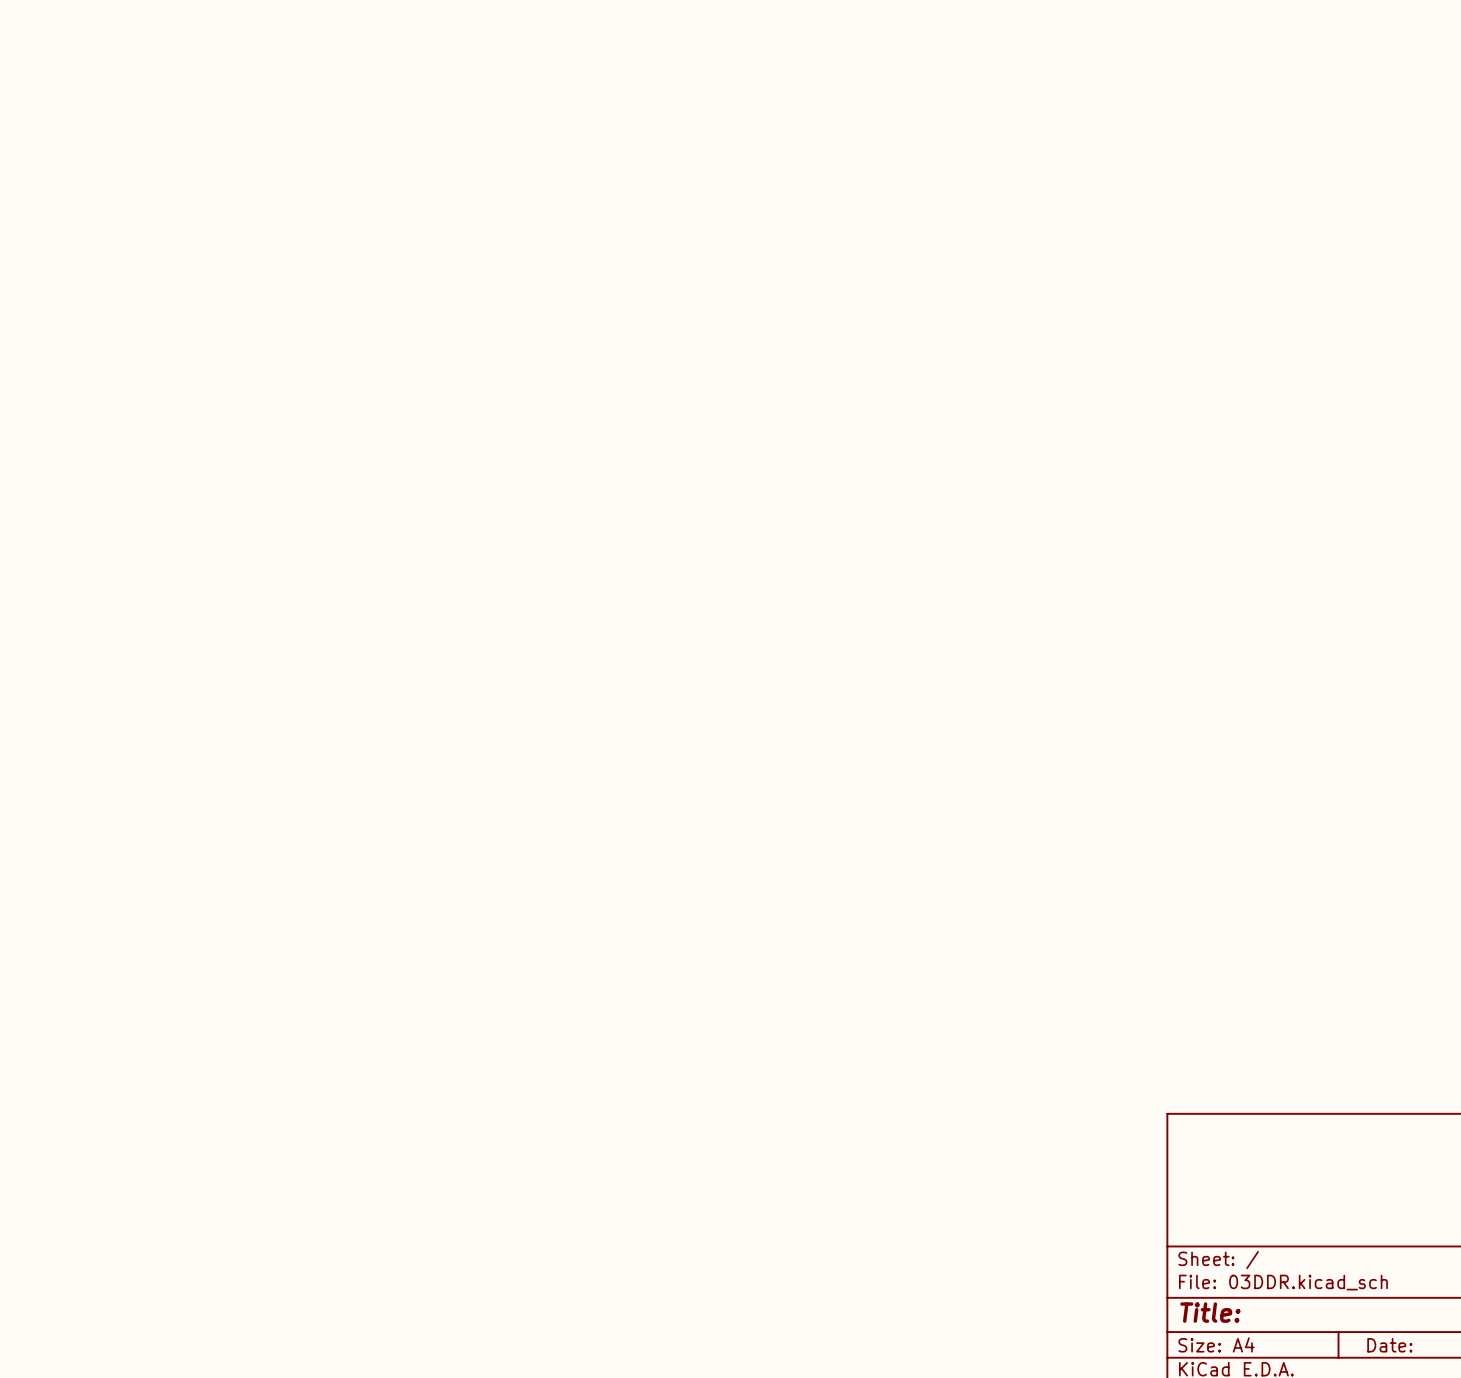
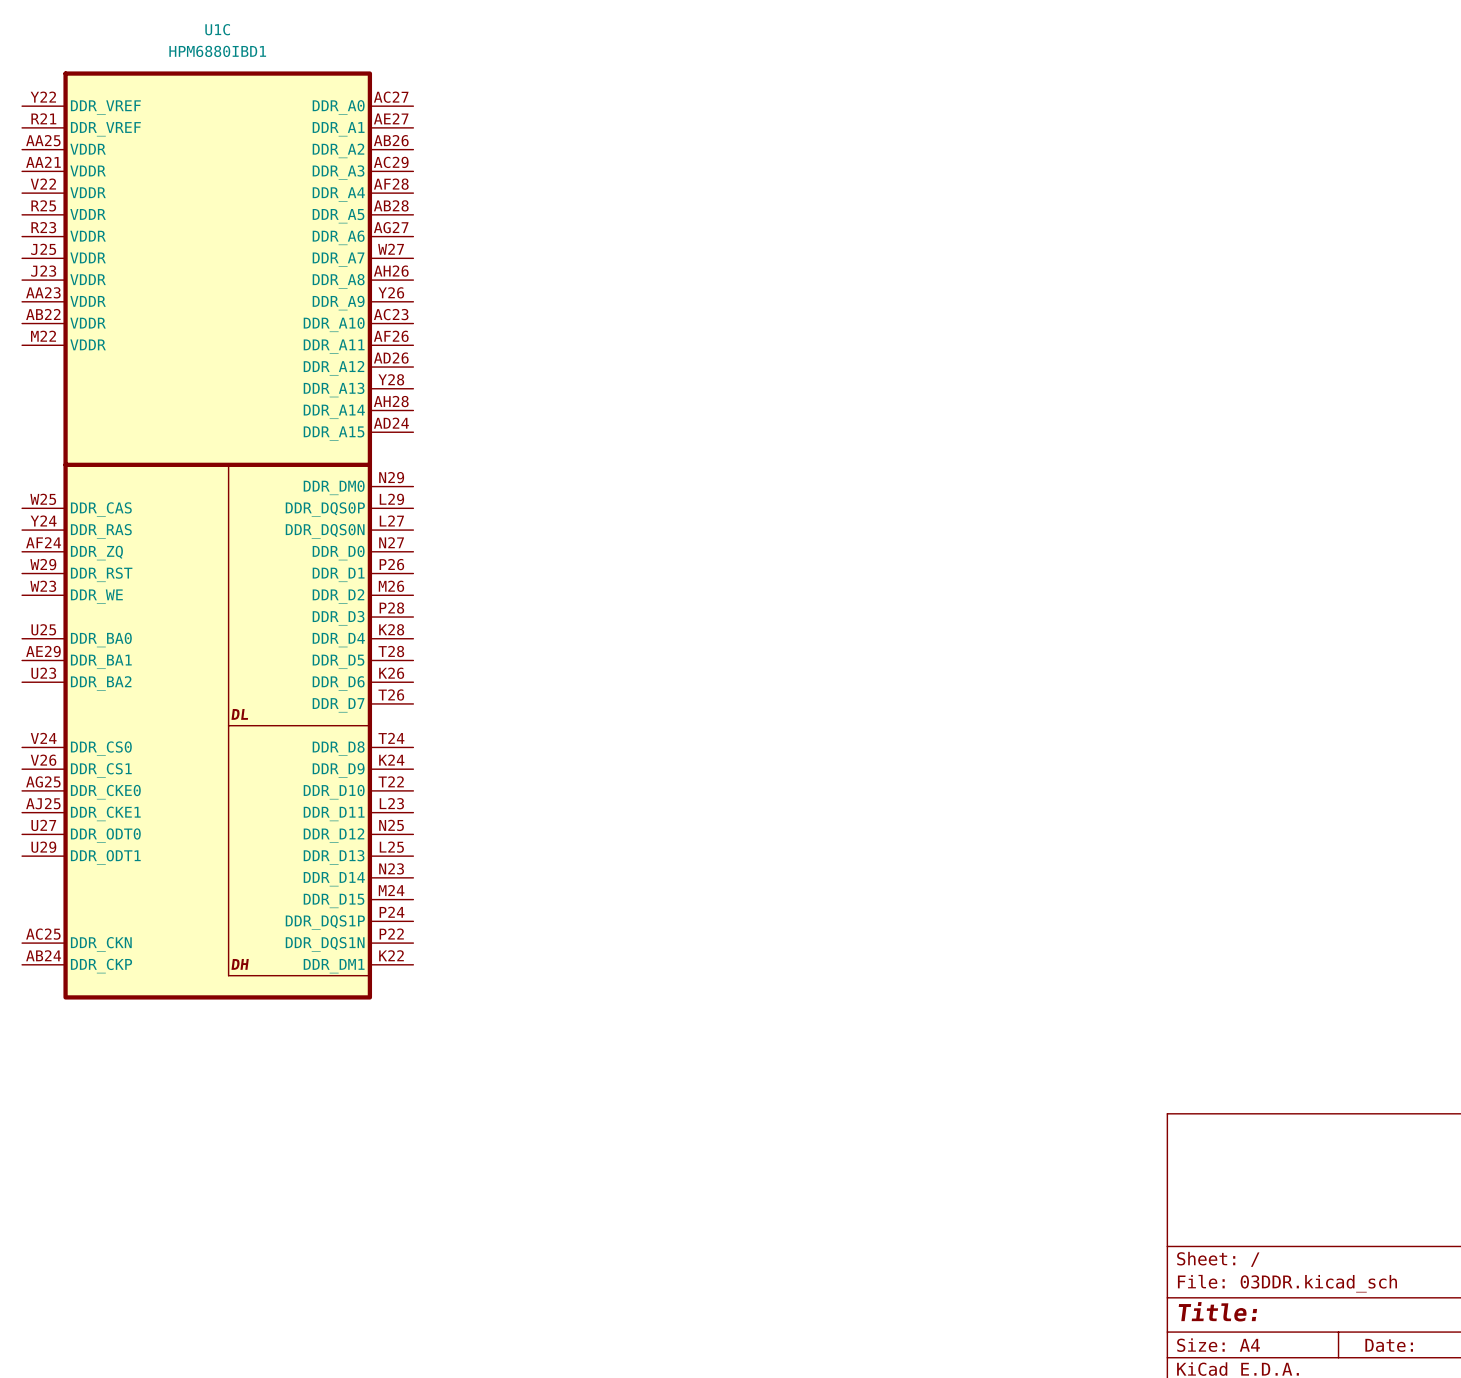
U1C: none -> HPM6880IBD1 (217, 535)

